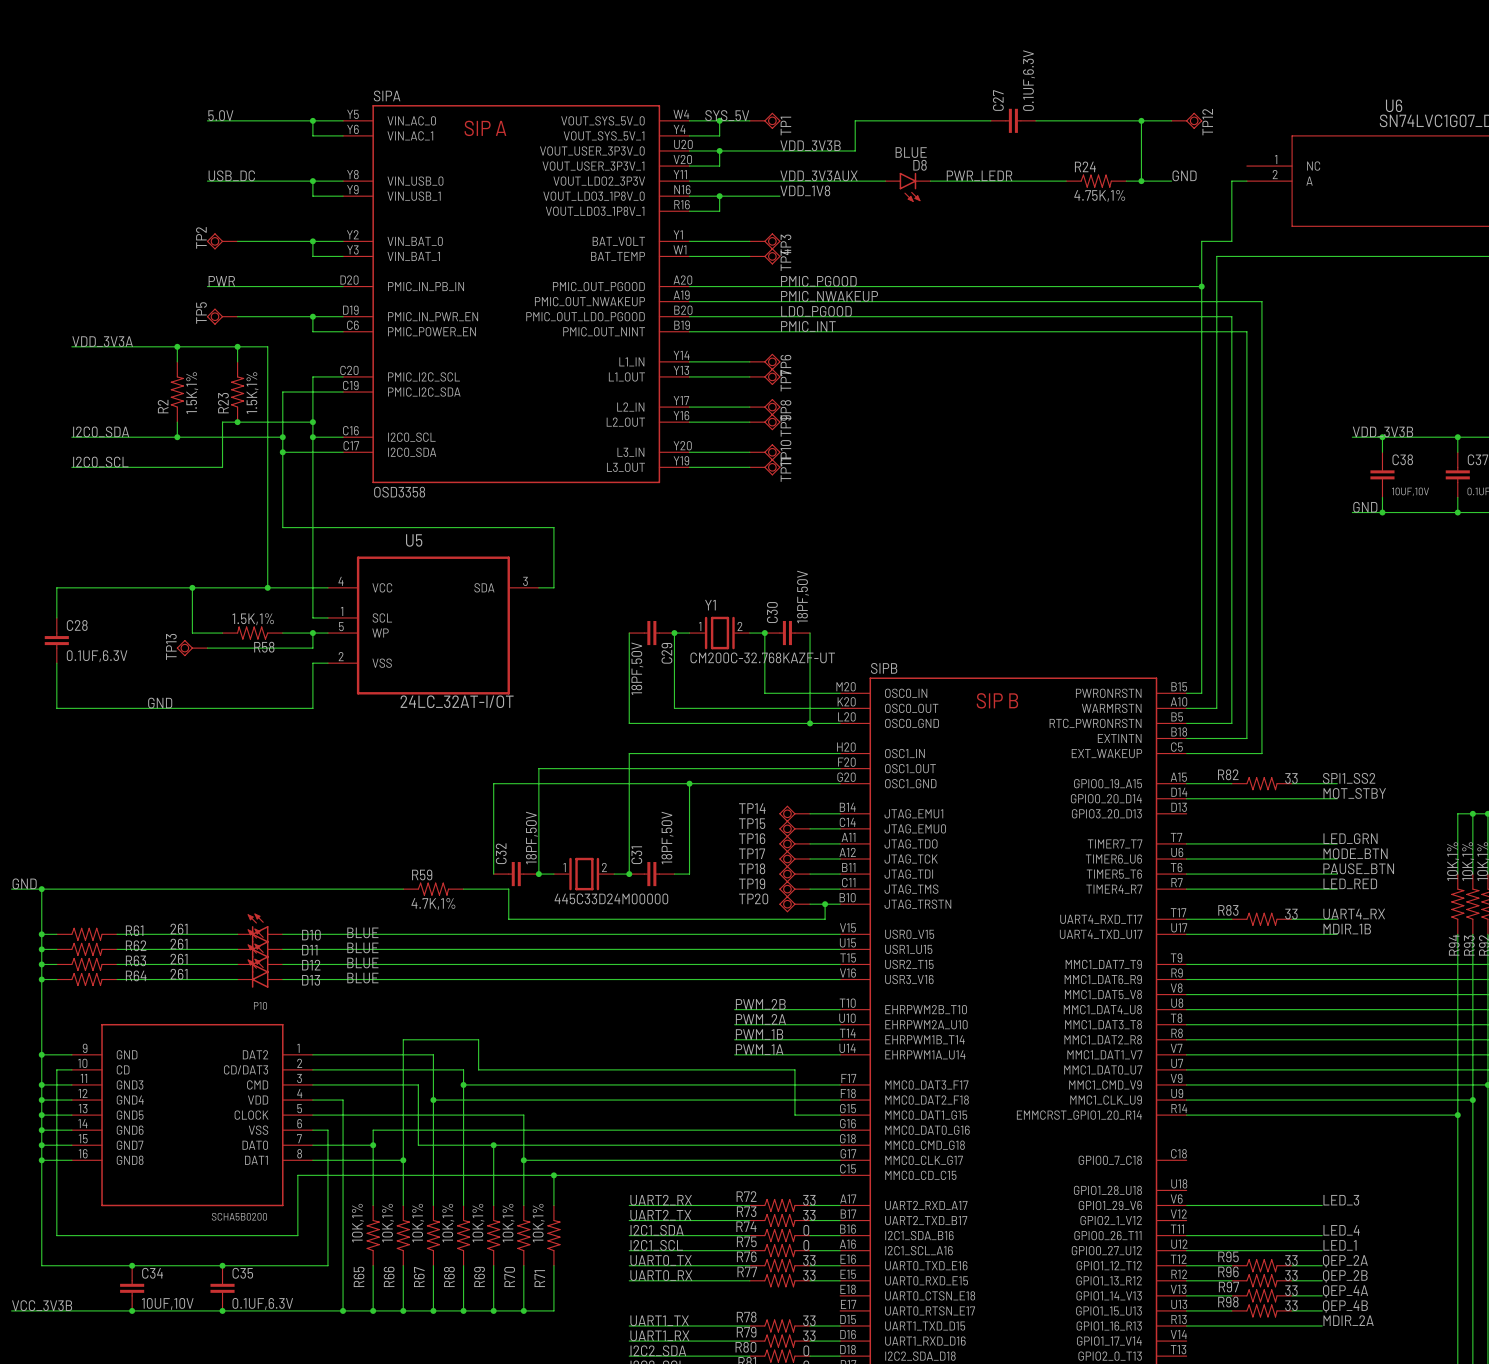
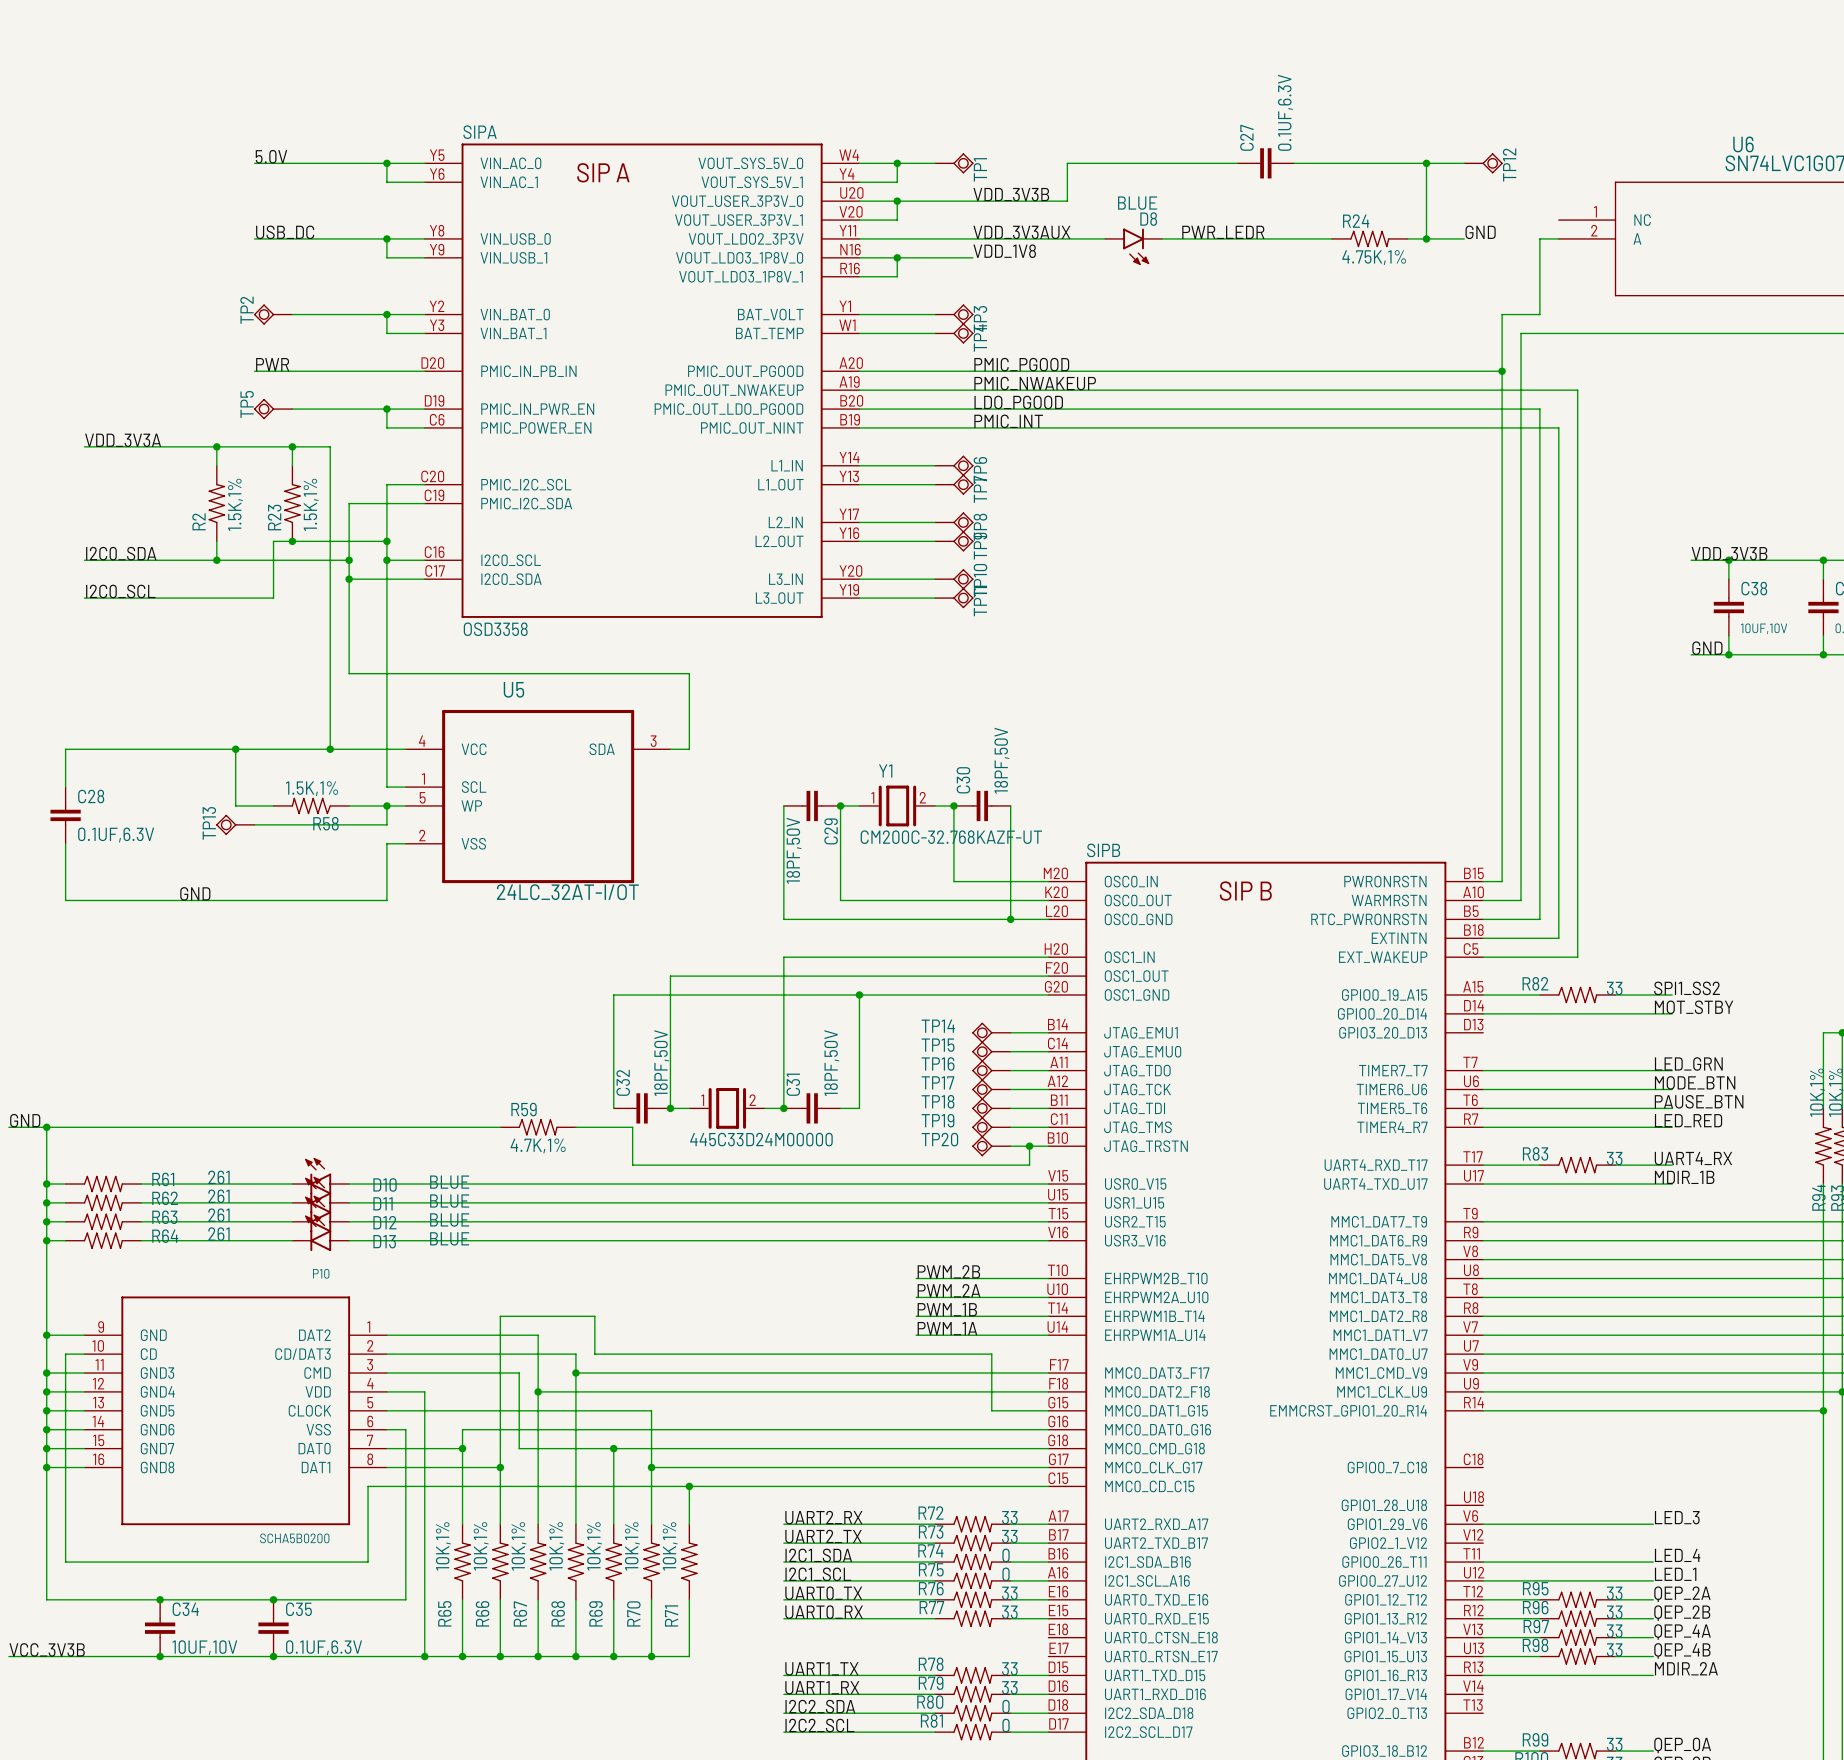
label: SYS_5V (727, 115) -> none

